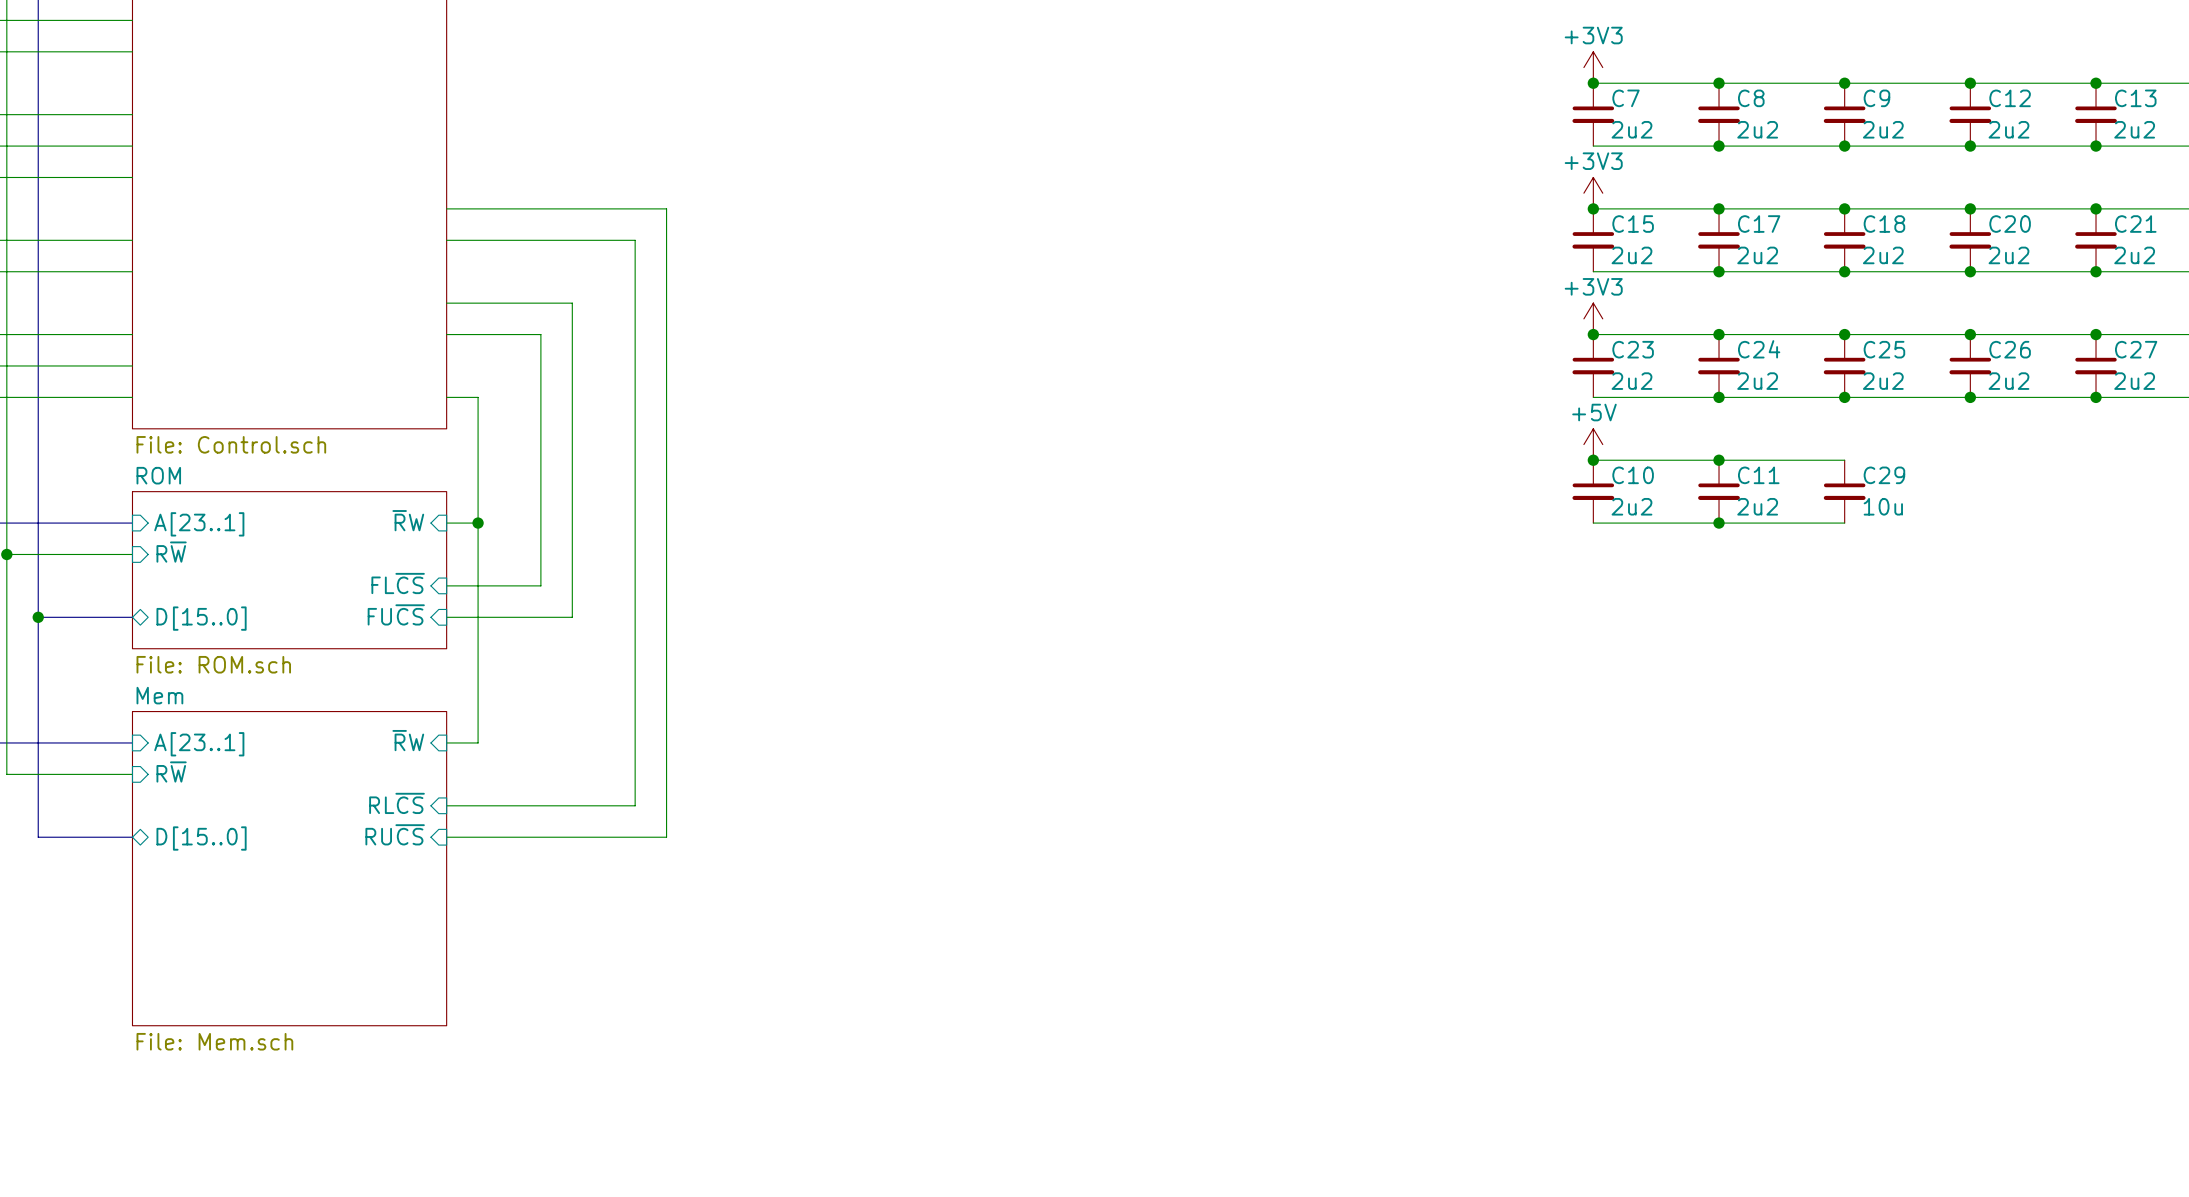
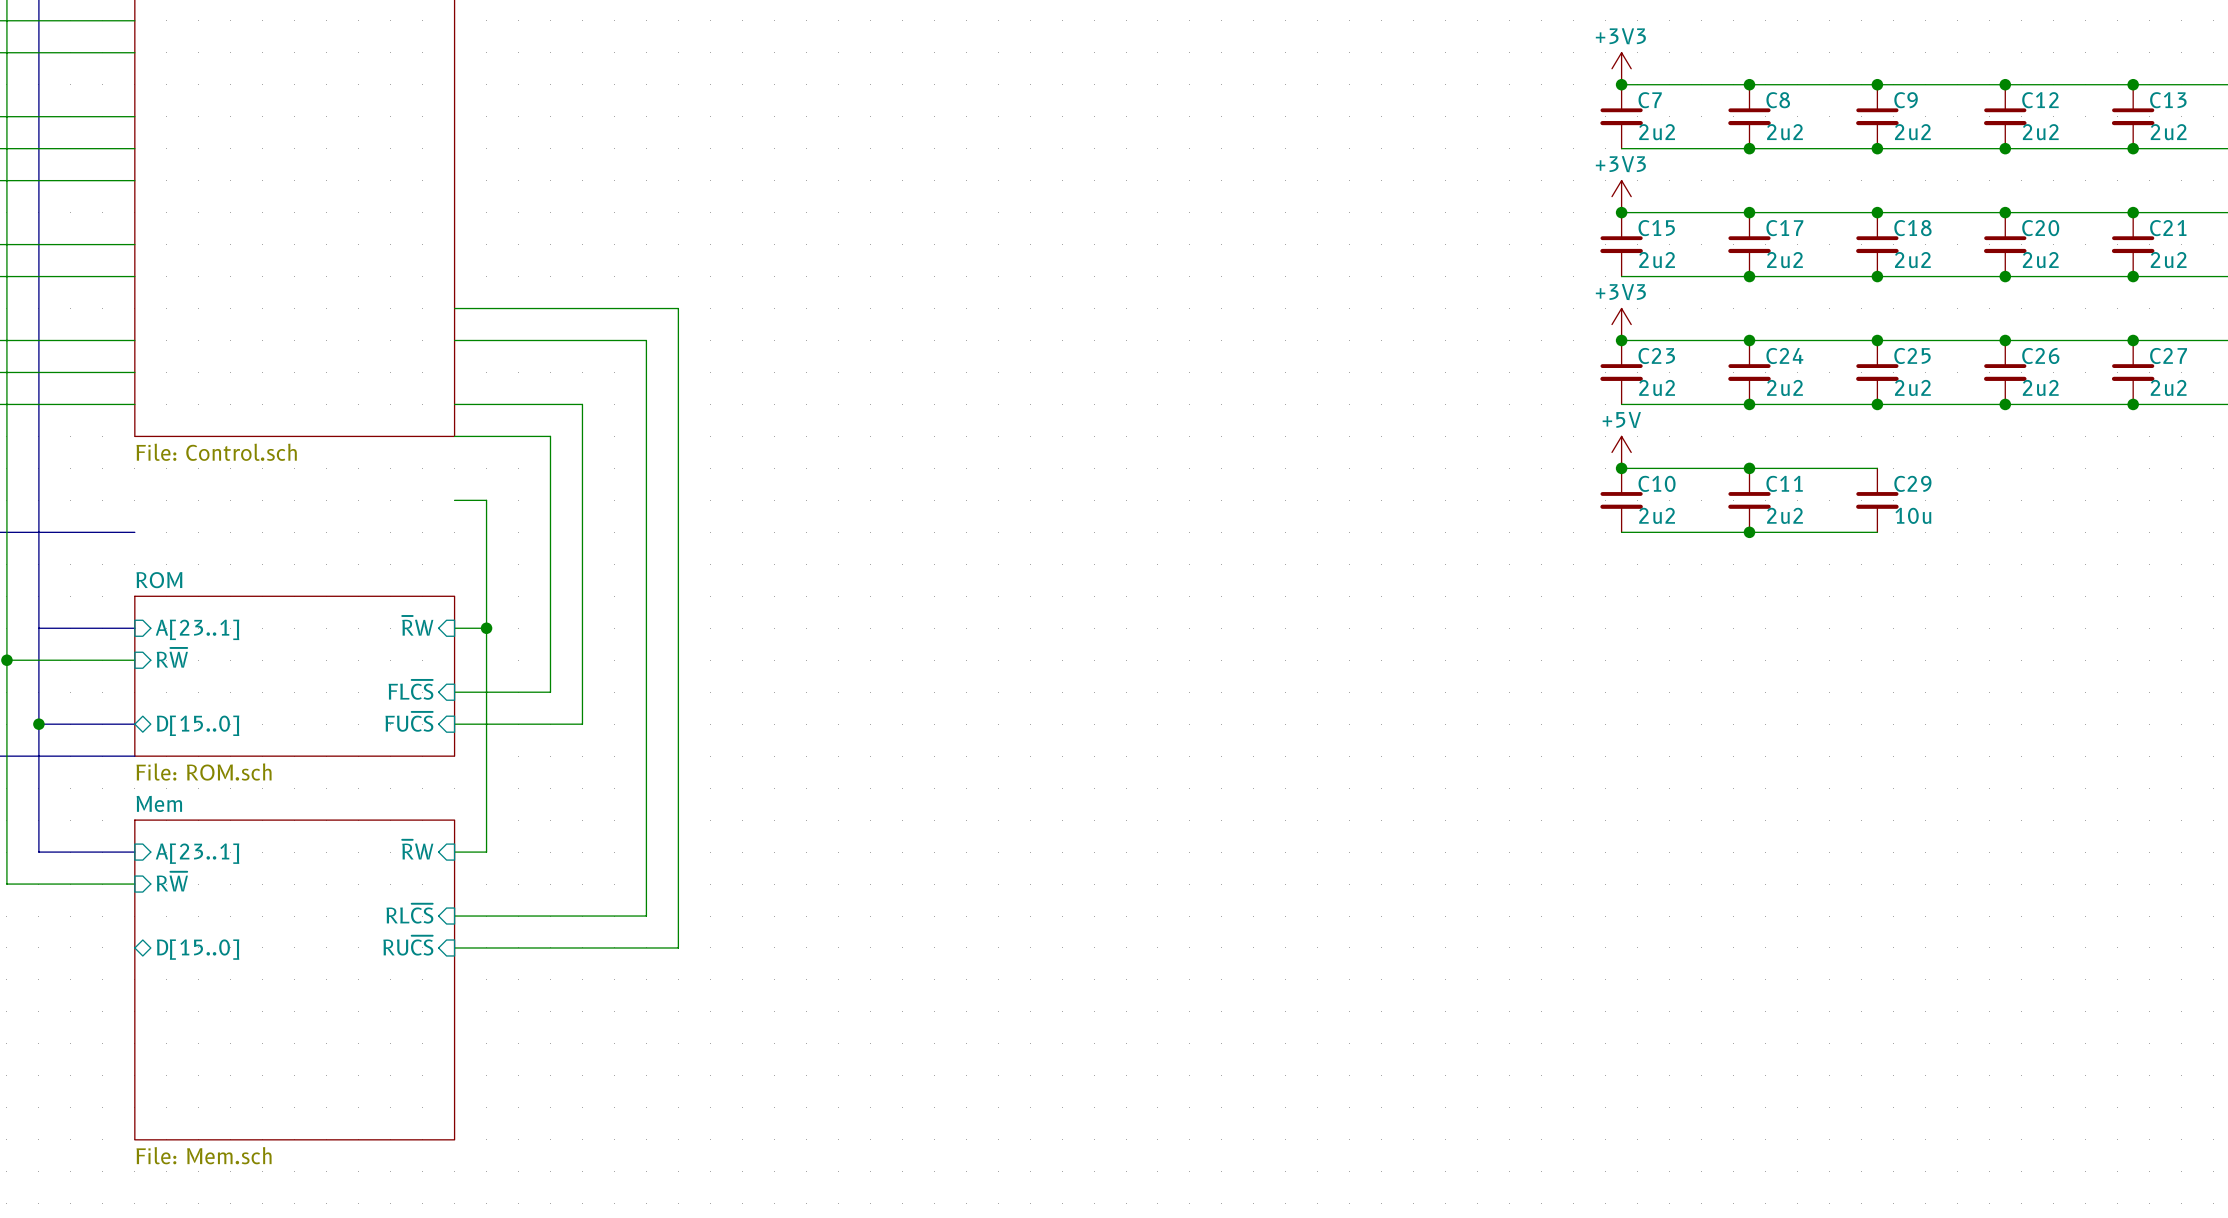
wire: (446, 208) (666, 208) (666, 303) -> none
wire: (446, 240) (635, 240) (635, 334) -> (550, 340) (646, 340)
wire: (572, 303) (572, 397) -> (582, 308) (678, 308)
wire: (540, 334) (540, 428) -> (454, 436) (550, 436)
wire: (478, 397) (478, 491) -> (454, 500) (486, 500)
wire: none -> (486, 404) (582, 404)
sheet pin: ~{R}W (408, 520) -> none
wire: (446, 523) (478, 523) -> none
junction: (478, 523) -> none
sheet pin: A[23..1] (199, 524) -> none
sheet pin: R~{W} (171, 552) -> none
wire: (6, 554) (132, 554) -> (6, 660) (134, 660)
junction: (6, 554) -> none
sheet ROM position: (289, 570) -> (294, 676)
sheet pin position: FL~{CS} (398, 583) -> FL~{CS} (410, 689)
wire: (446, 585) (540, 585) -> (454, 692) (550, 692) (550, 596)
sheet pin: FU~{CS} (396, 614) -> ~{R}W (417, 625)
junction: (38, 617) -> none
wire: (478, 617) (572, 617) -> (454, 724) (582, 724) (582, 628)
junction: none -> (486, 628)
sheet pin shape: bidirectional (201, 618) -> input (197, 629)
sheet pin: D[15..0] (201, 618) -> A[23..1] (197, 629)
sheet pin: none -> R~{W} (172, 657)
junction: none -> (6, 660)
sheet pin: none -> FU~{CS} (409, 721)
bus: none -> (38, 724) (134, 724)
junction: none -> (38, 724)
sheet pin: none -> D[15..0] (198, 725)
sheet pin: ~{R}W (408, 740) -> none
wire: (446, 742) (478, 742) -> (486, 852) (486, 756)
sheet pin: A[23..1] (199, 744) -> none
sheet pin: R~{W} (171, 772) -> none
wire: (6, 774) (132, 774) -> (6, 788) (6, 884) (134, 884)
sheet pin position: RL~{CS} (397, 803) -> RL~{CS} (409, 913)
wire: (446, 805) (635, 805) -> (454, 916) (646, 916) (646, 820)
sheet pin: RU~{CS} (395, 834) -> ~{R}W (417, 849)
wire: (478, 837) (666, 837) -> (454, 947) (678, 947) (678, 852)
sheet pin shape: bidirectional (201, 838) -> input (197, 853)
sheet pin: D[15..0] (201, 838) -> A[23..1] (197, 853)
sheet pin: none -> R~{W} (172, 881)
sheet Mem position: (289, 868) -> (294, 979)
sheet pin: none -> RU~{CS} (408, 945)
sheet pin: none -> D[15..0] (198, 949)

